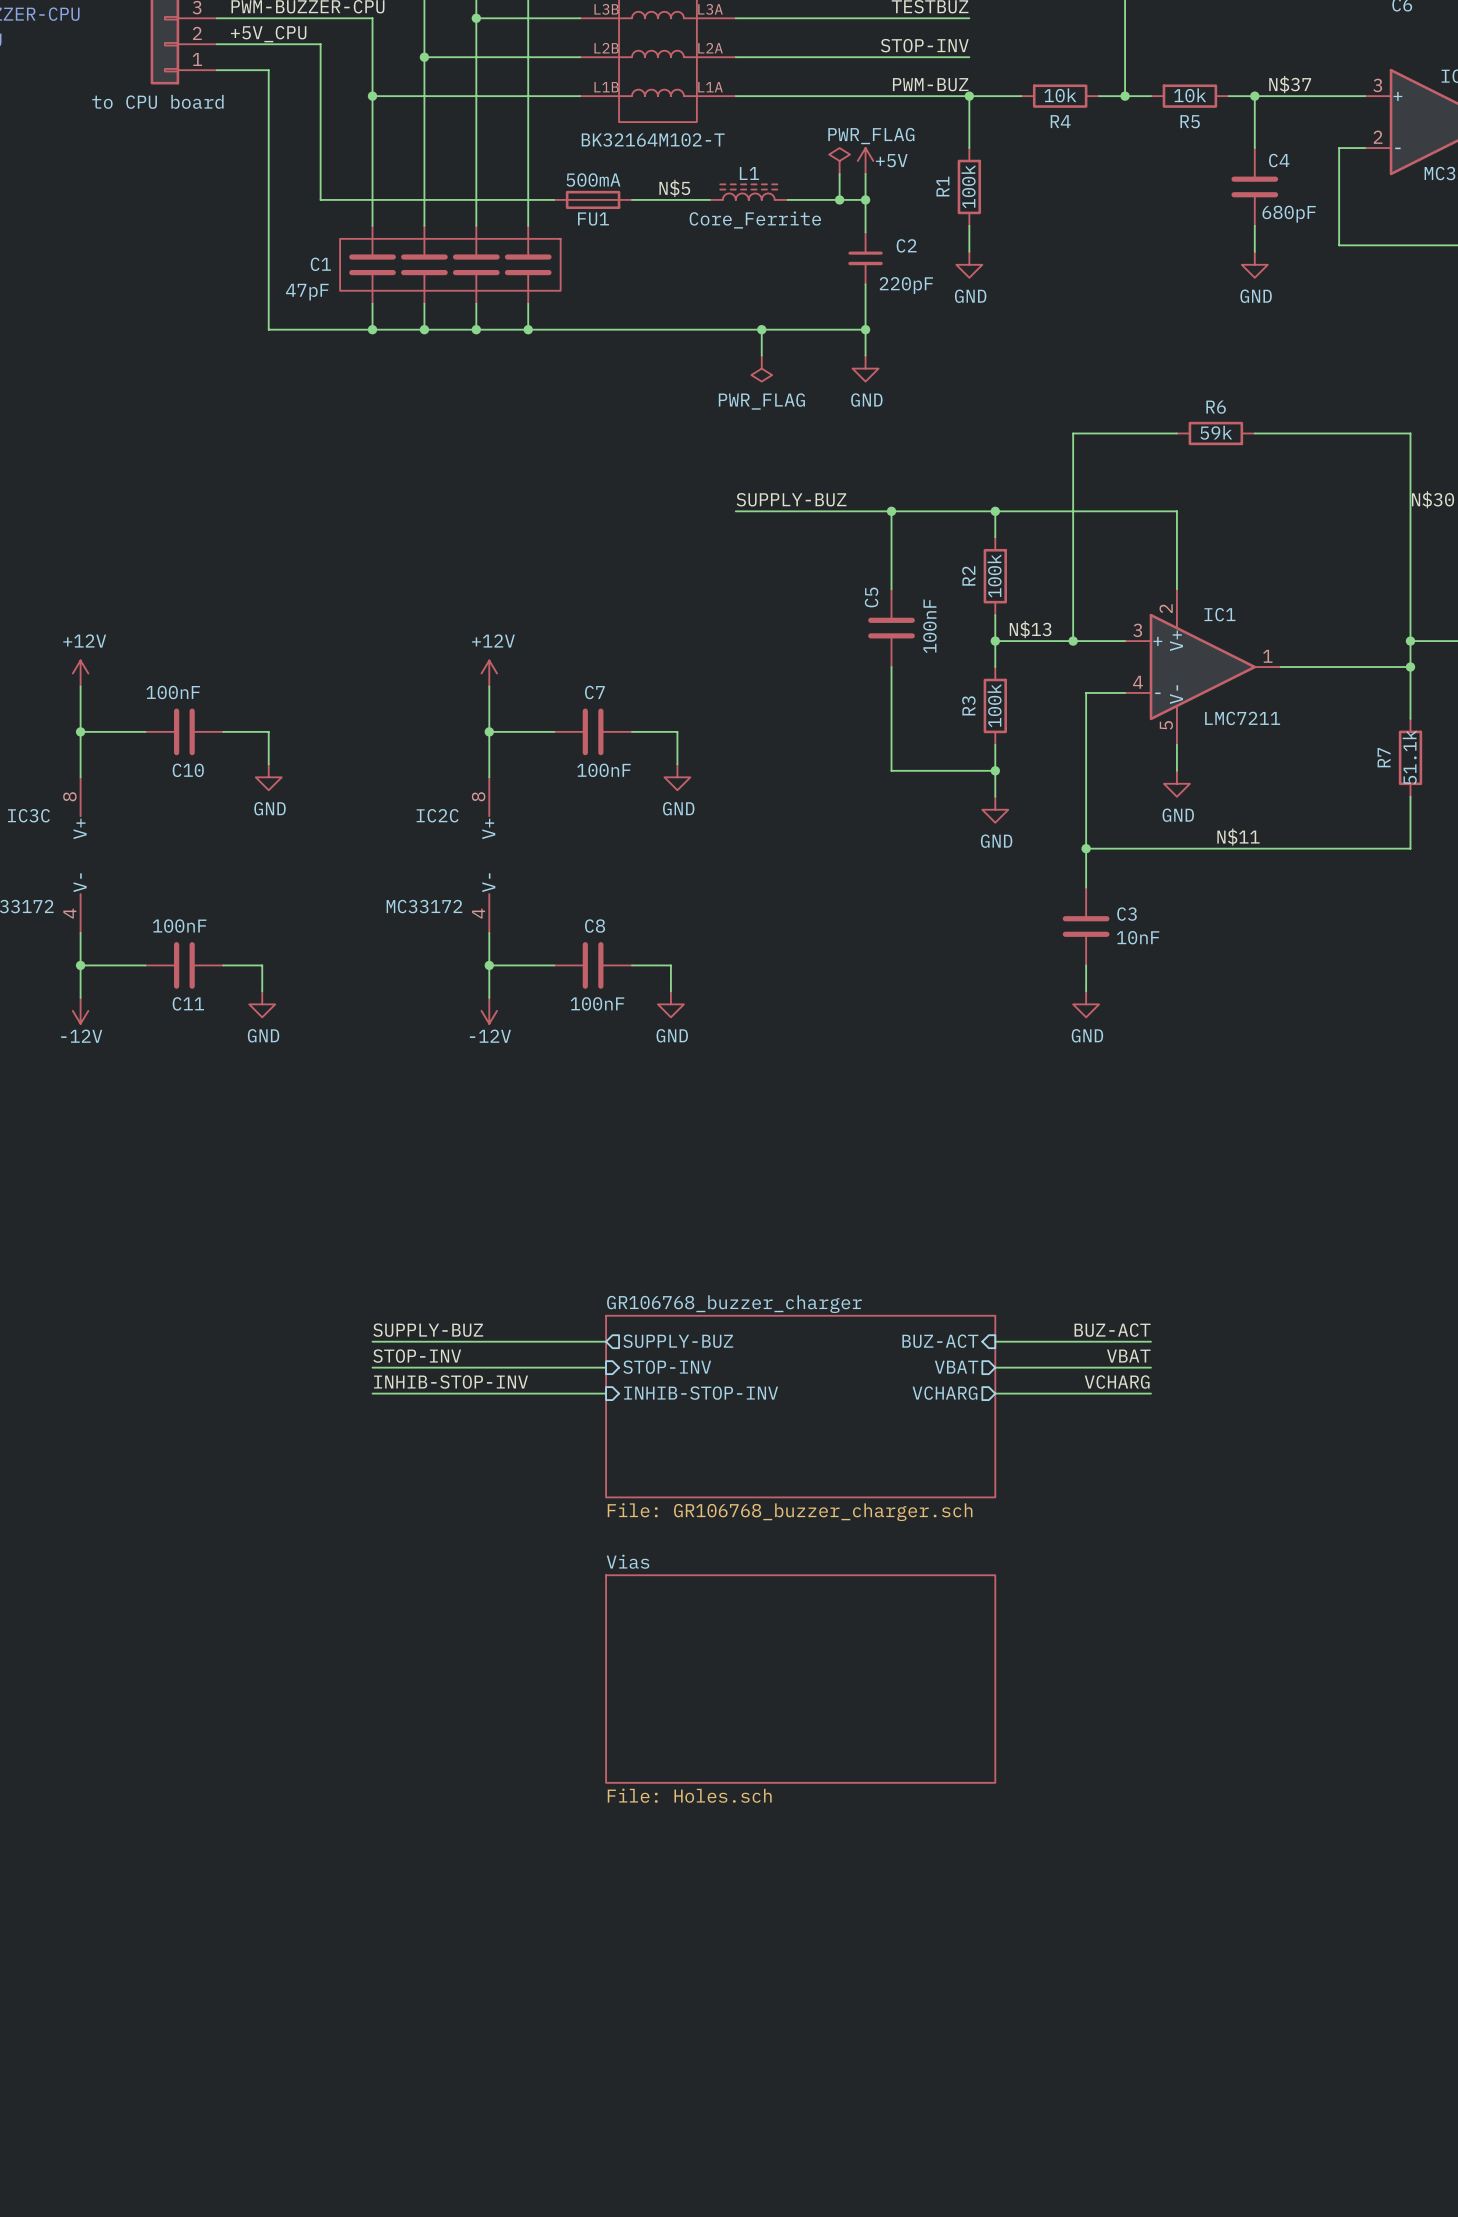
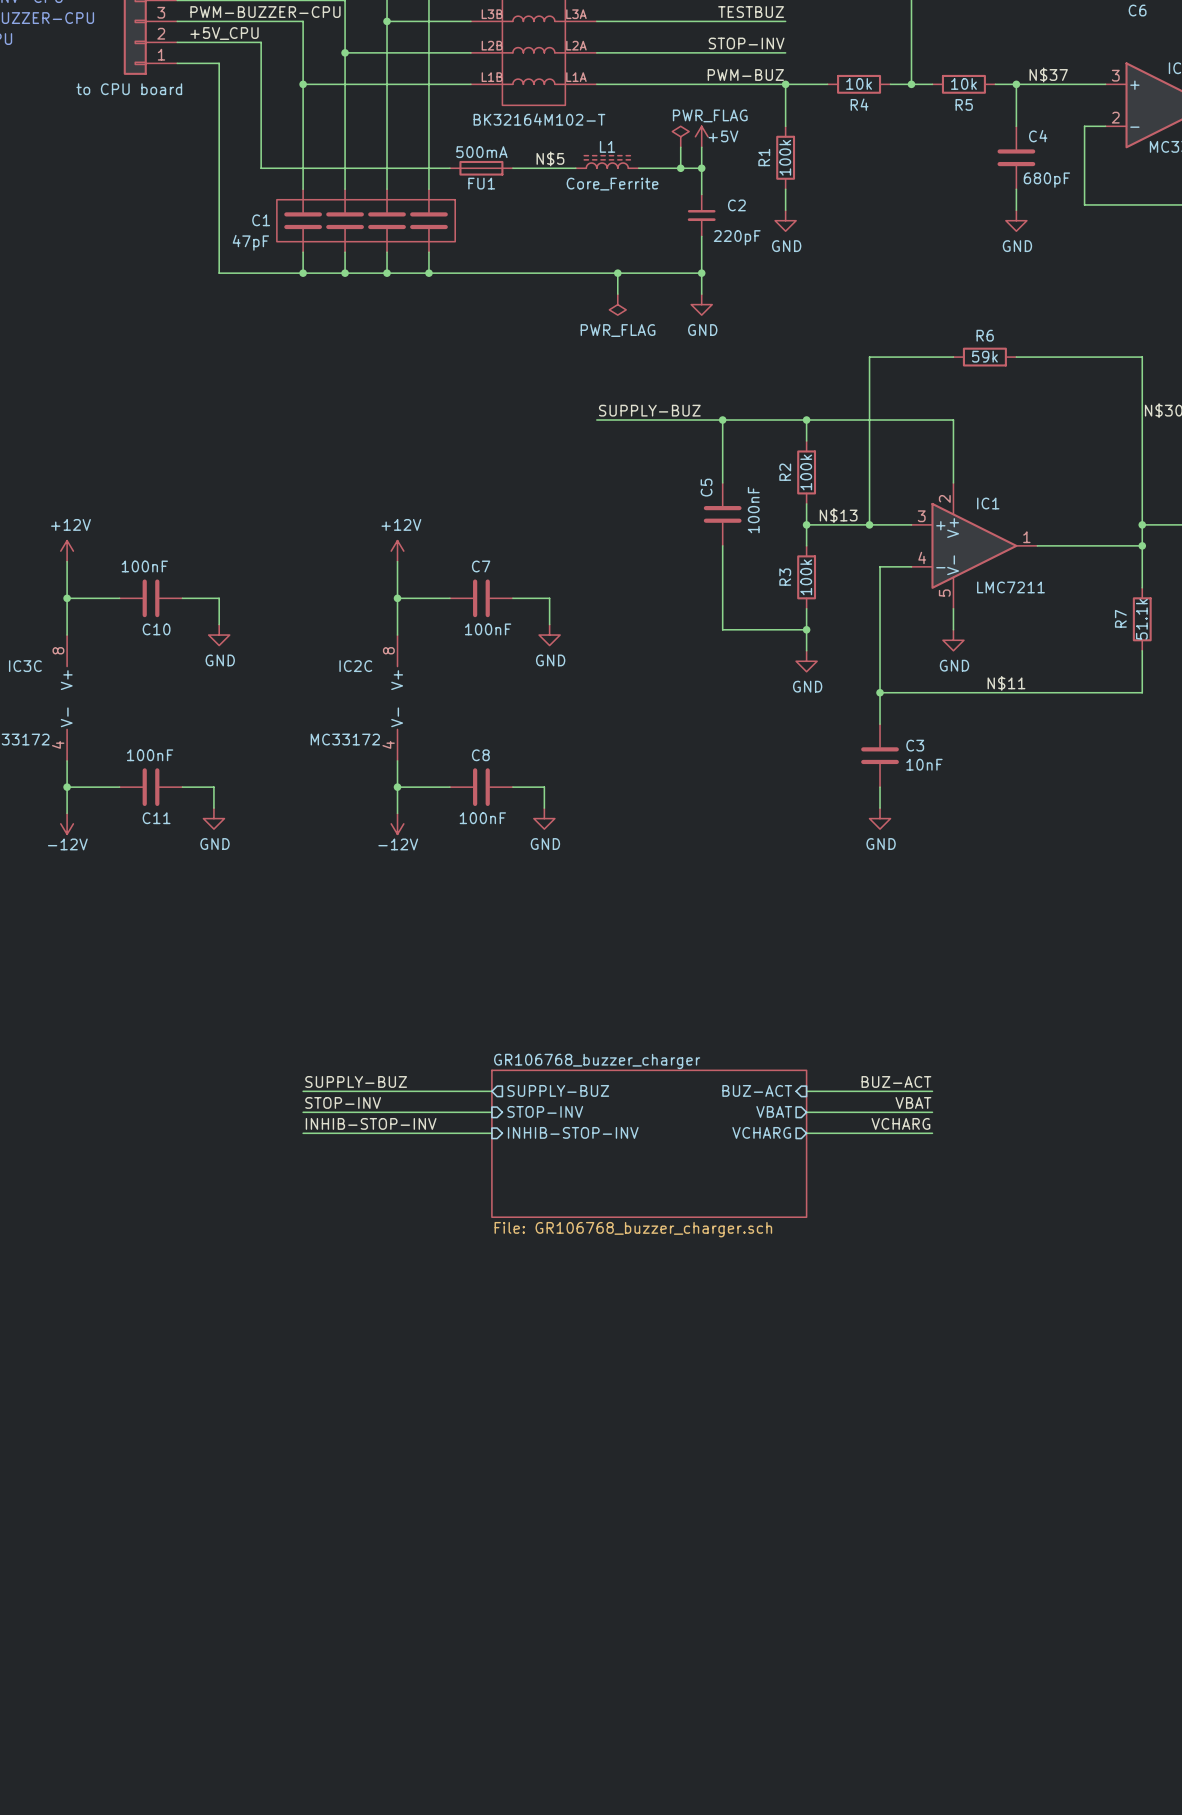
sheet Vias: File: Holes.sch (800, 1679) -> none

